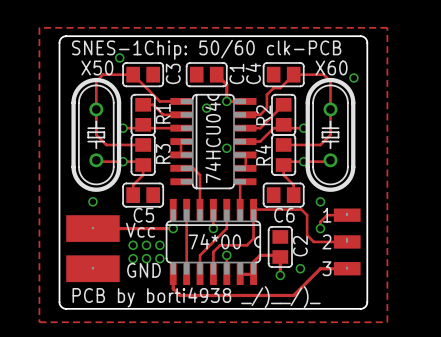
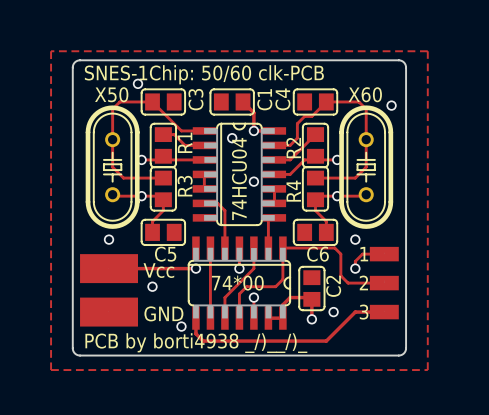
via: (146, 245) -> none
via: (159, 245) -> none
via: (133, 258) -> none
via: (146, 258) -> none
via: (159, 258) -> none
via: none -> (181, 326)

